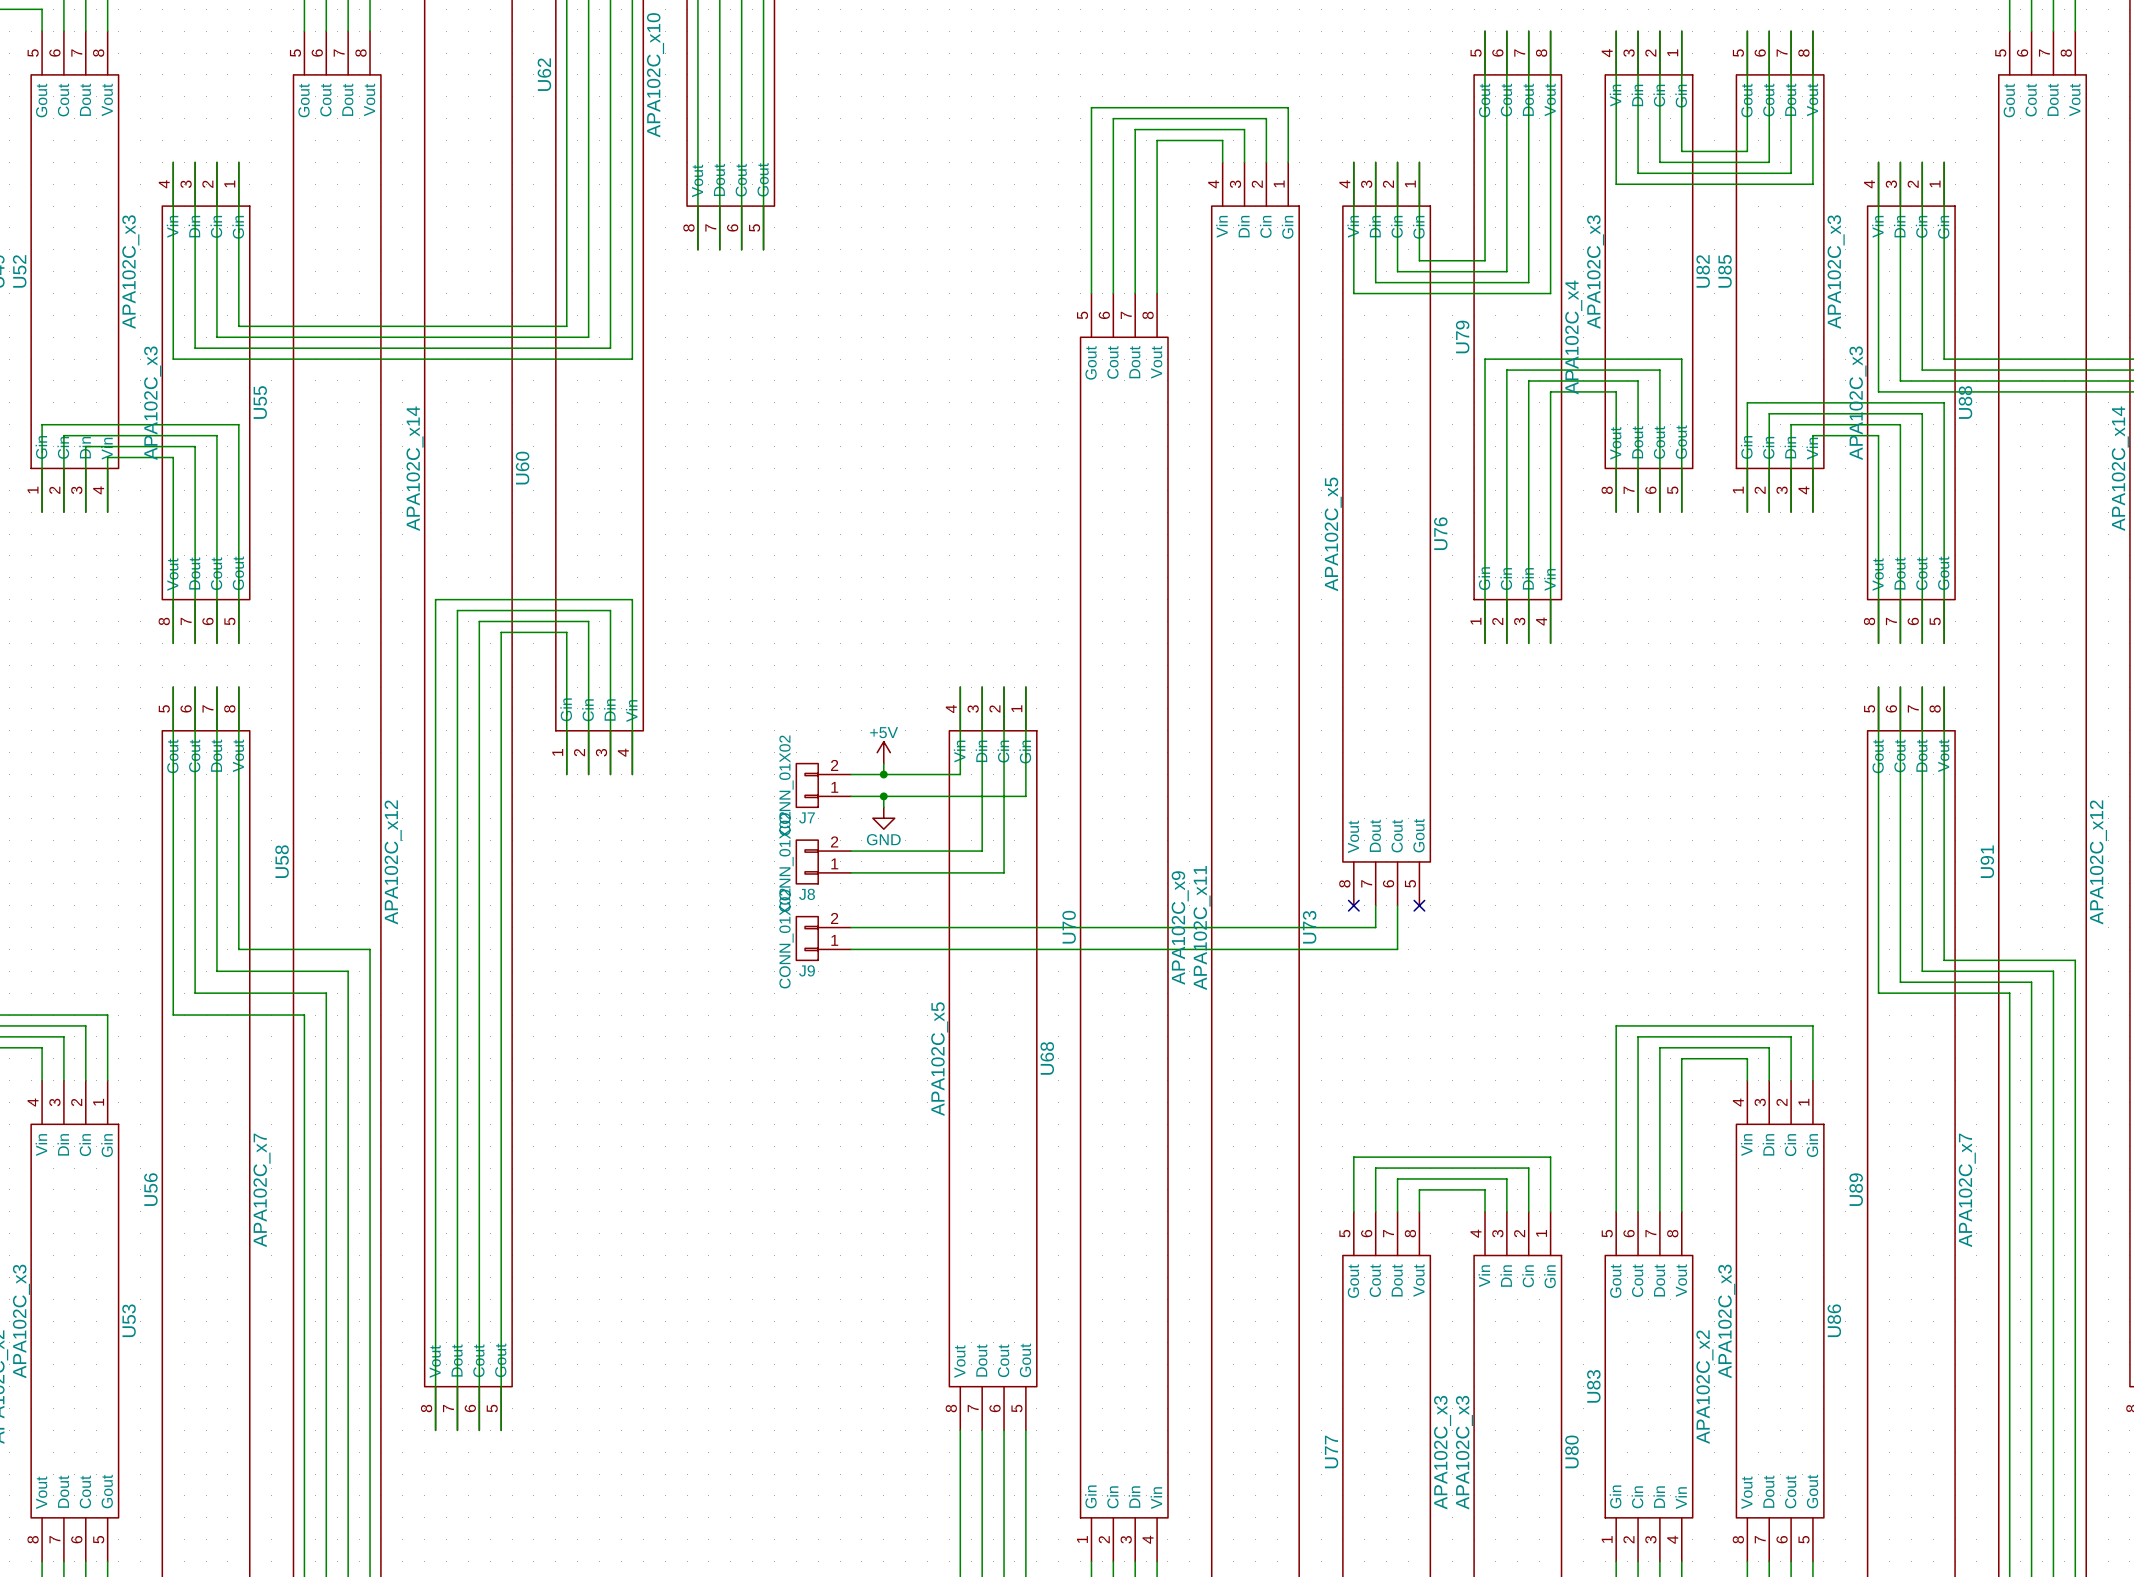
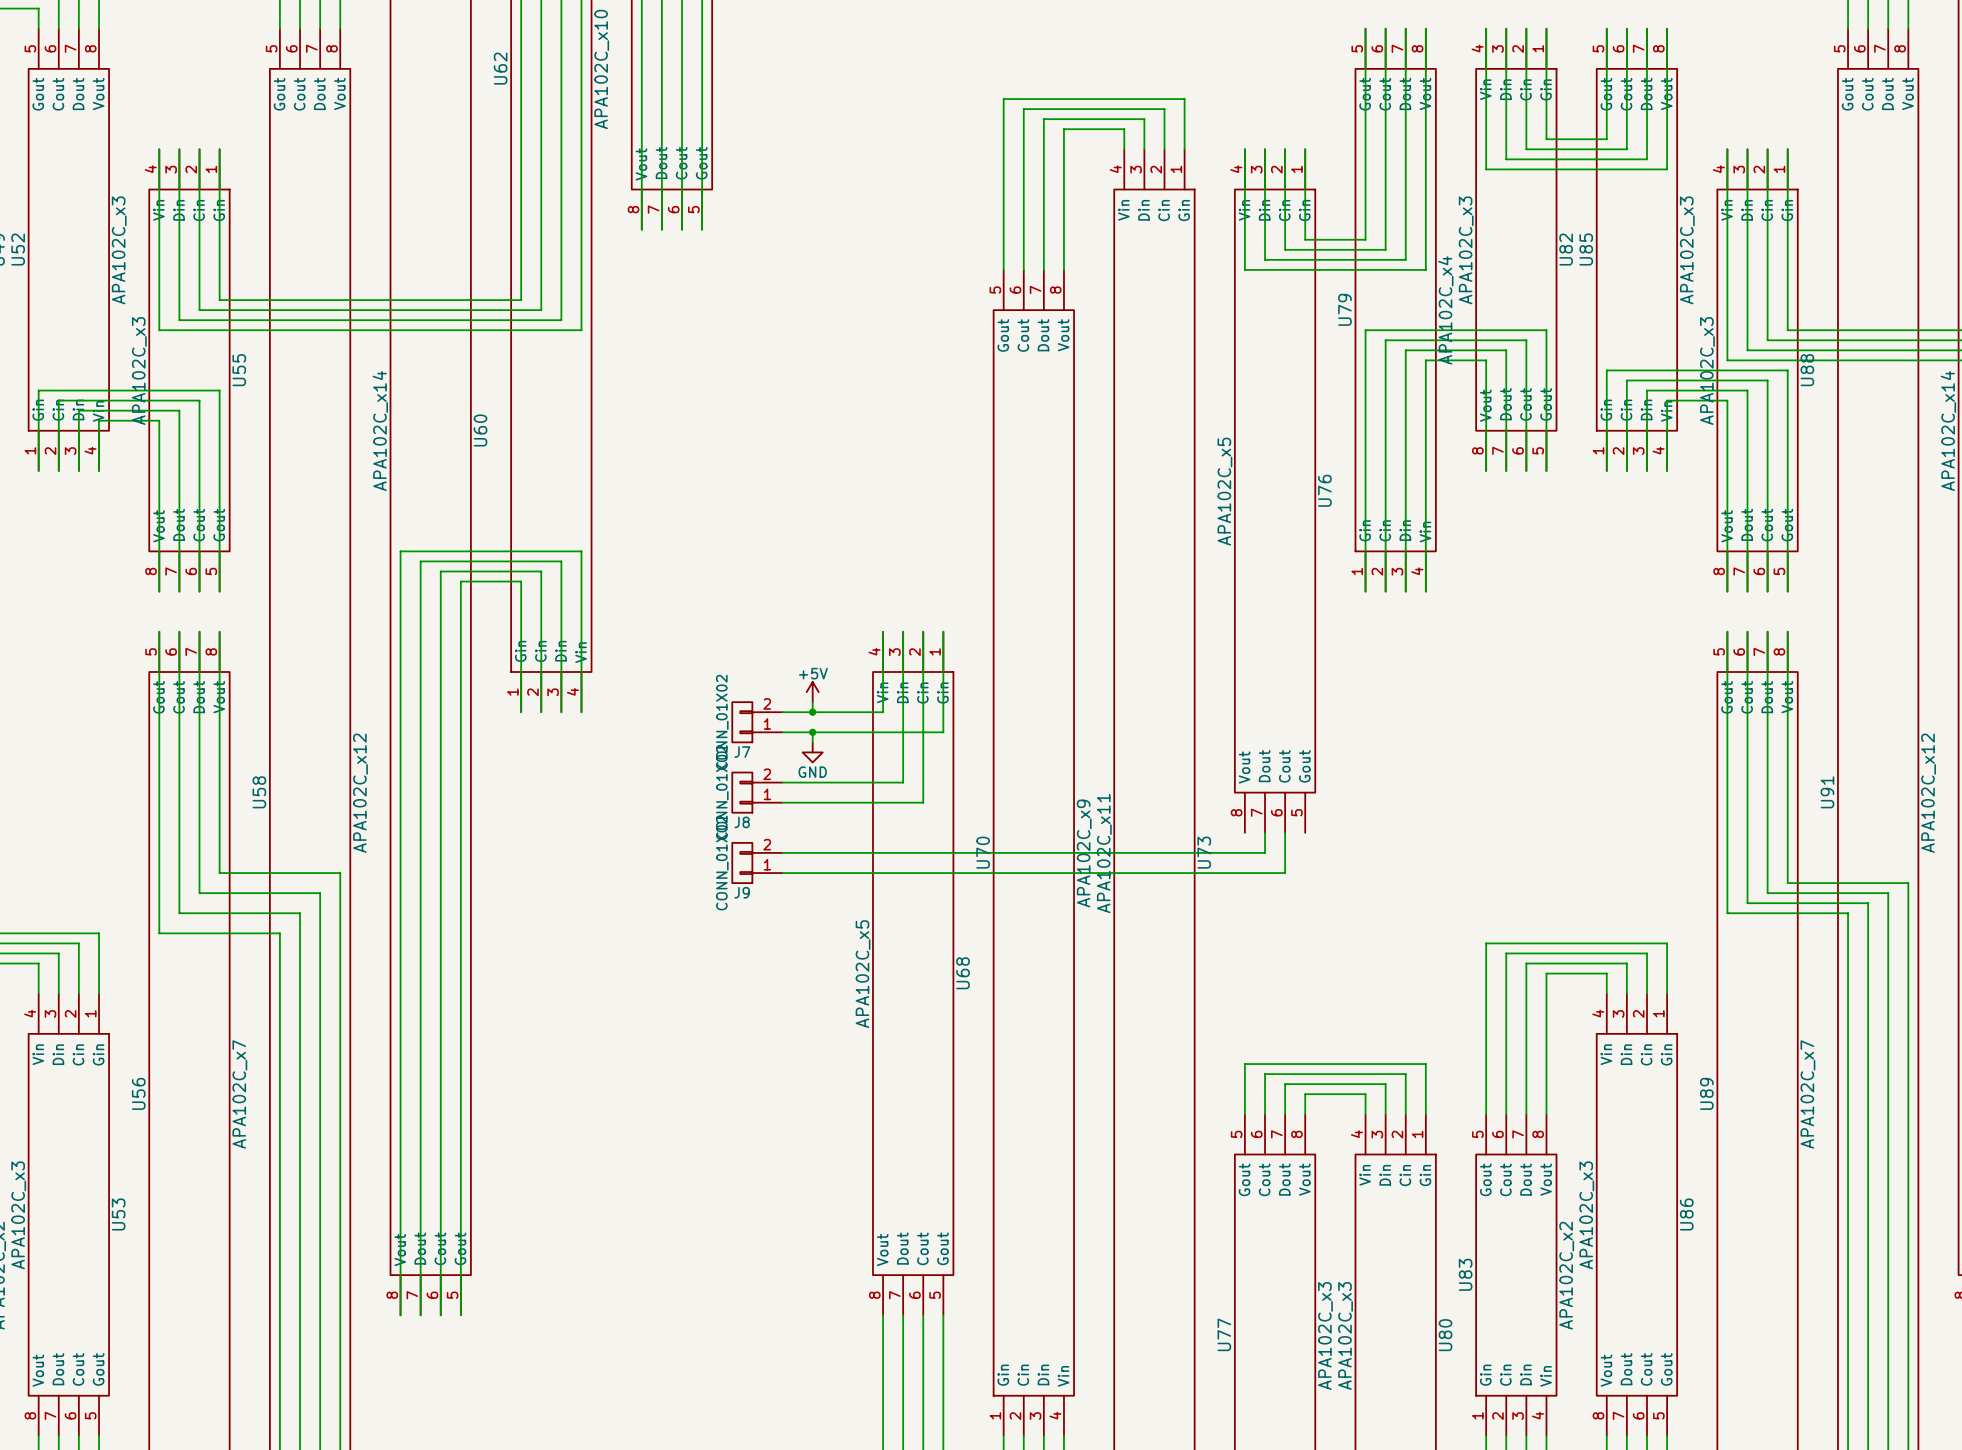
no-connect mark: (1353, 905) -> none
no-connect mark: (1419, 905) -> none

